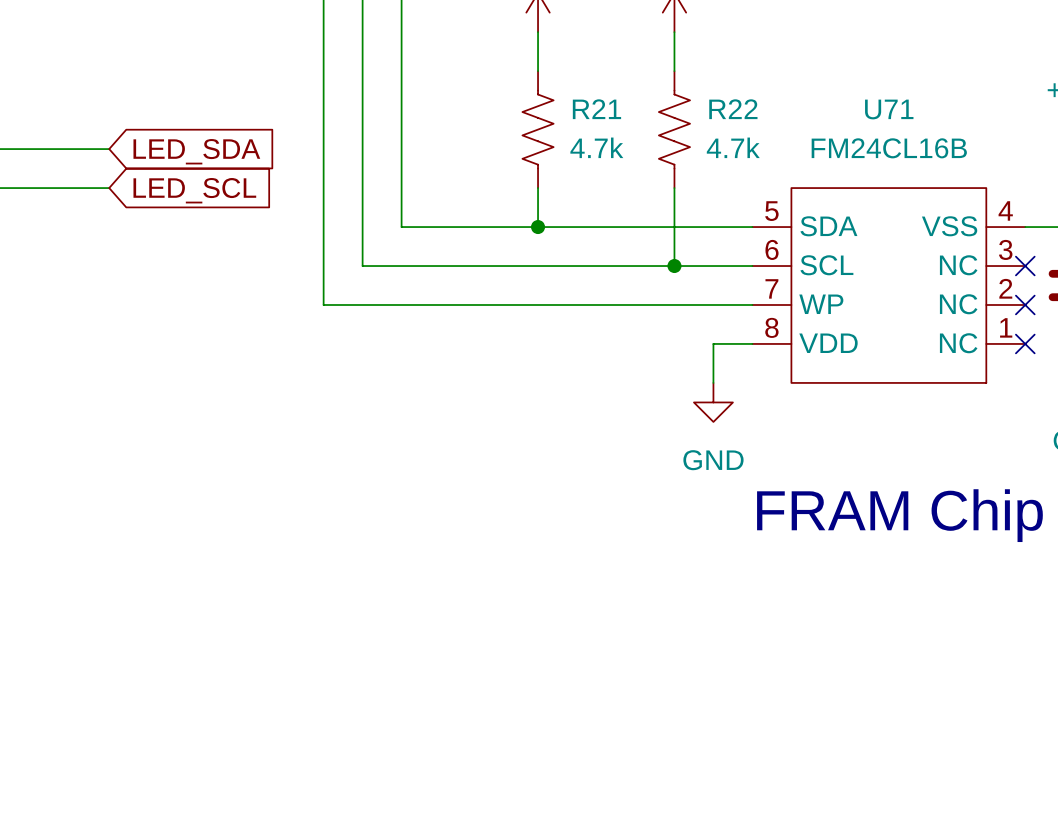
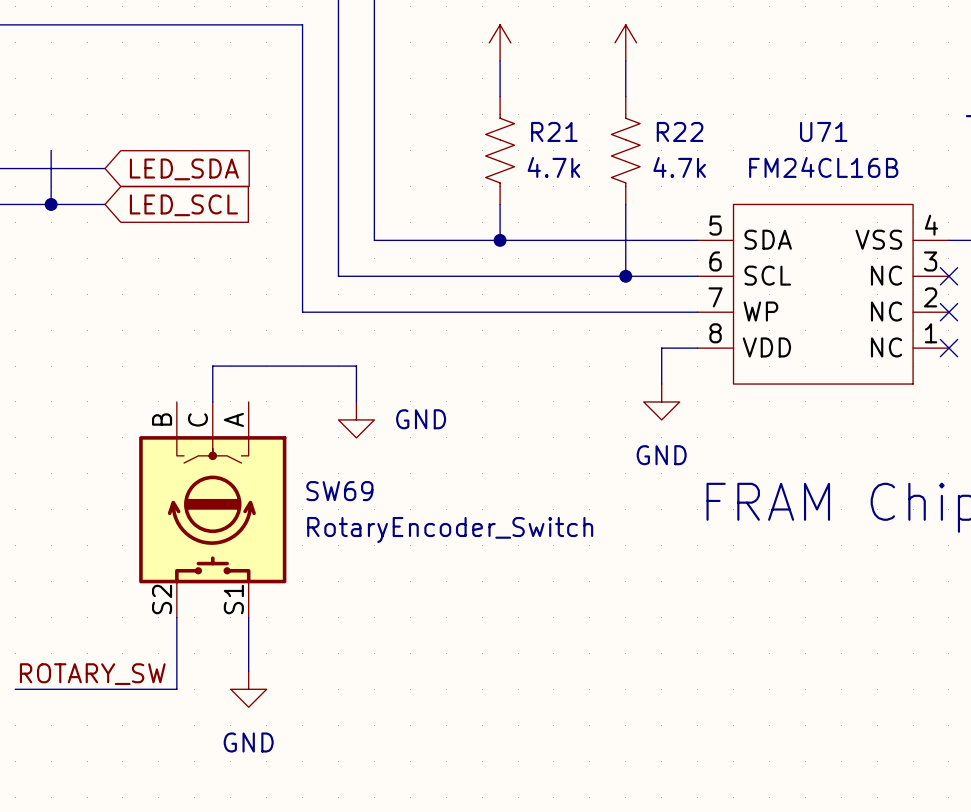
wire: none -> (51, 150) (51, 204)
junction: none -> (51, 204)
wire: none -> (212, 401) (212, 366) (356, 366) (356, 401)
power symbol: none -> GND (356, 419)
SW69: none -> RotaryEncoder_Switch (212, 509)
wire: none -> (176, 617) (176, 689) (15, 689)
wire: none -> (248, 617) (248, 671)
label: none -> ROTARY_SW (92, 674)
power symbol: none -> GND (248, 689)

